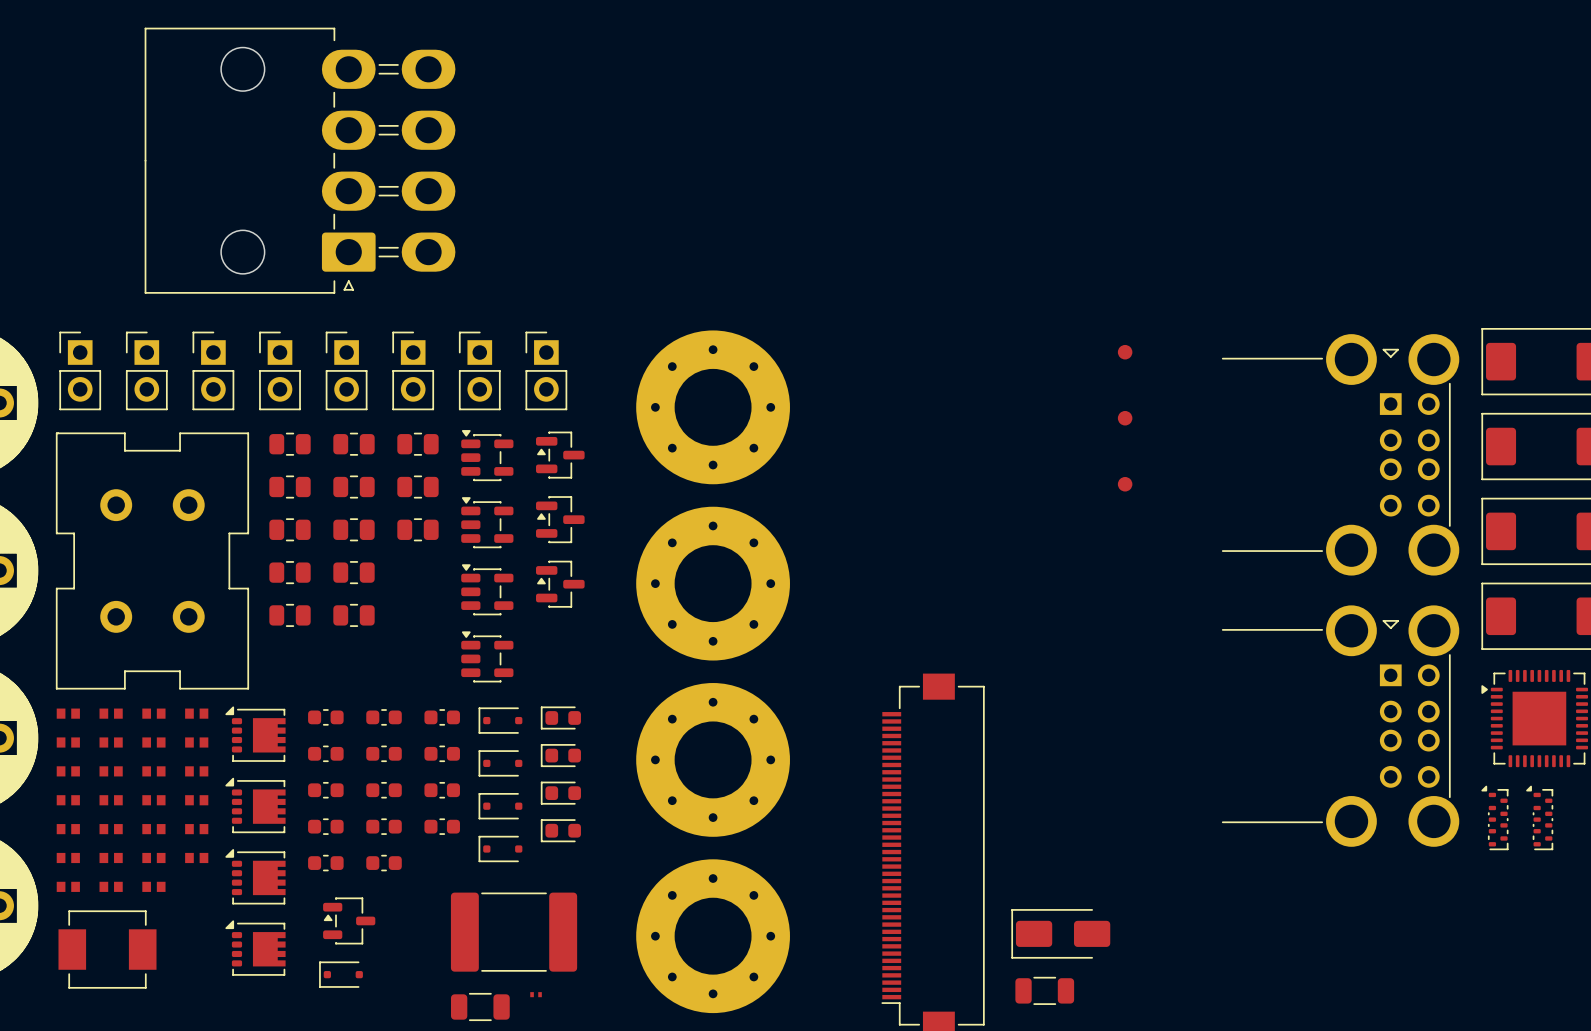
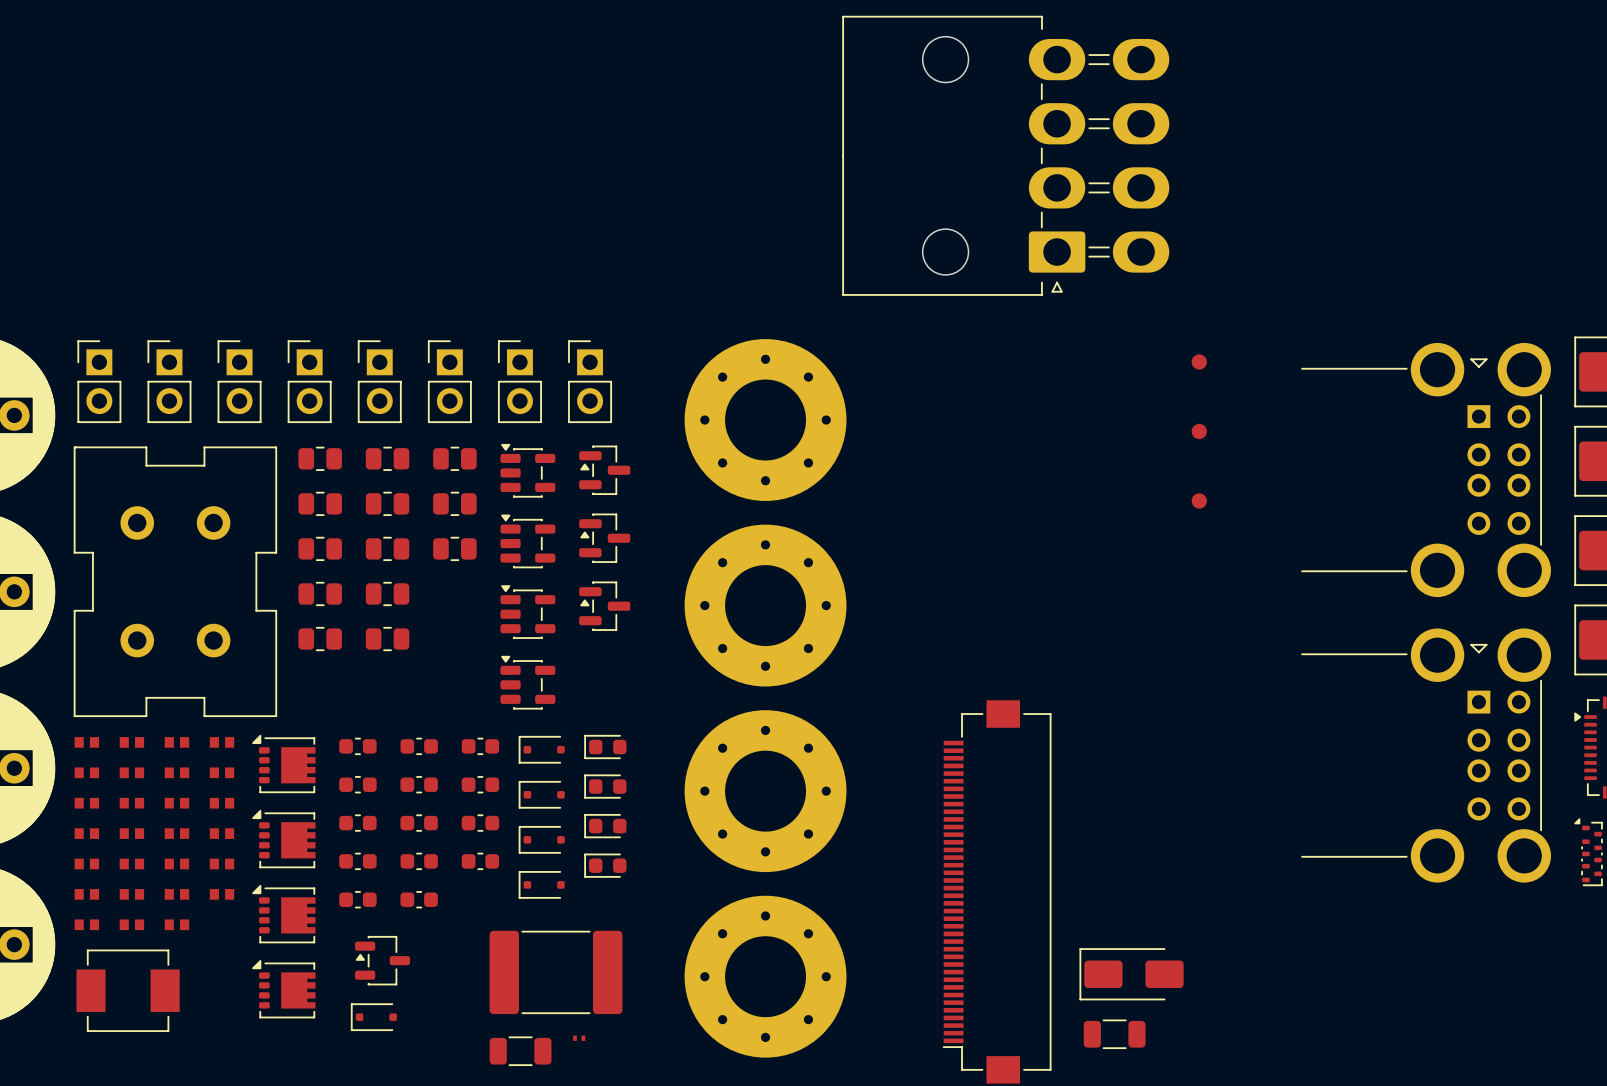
part: none -> (1005, 155)
part: (300, 160) -> none

